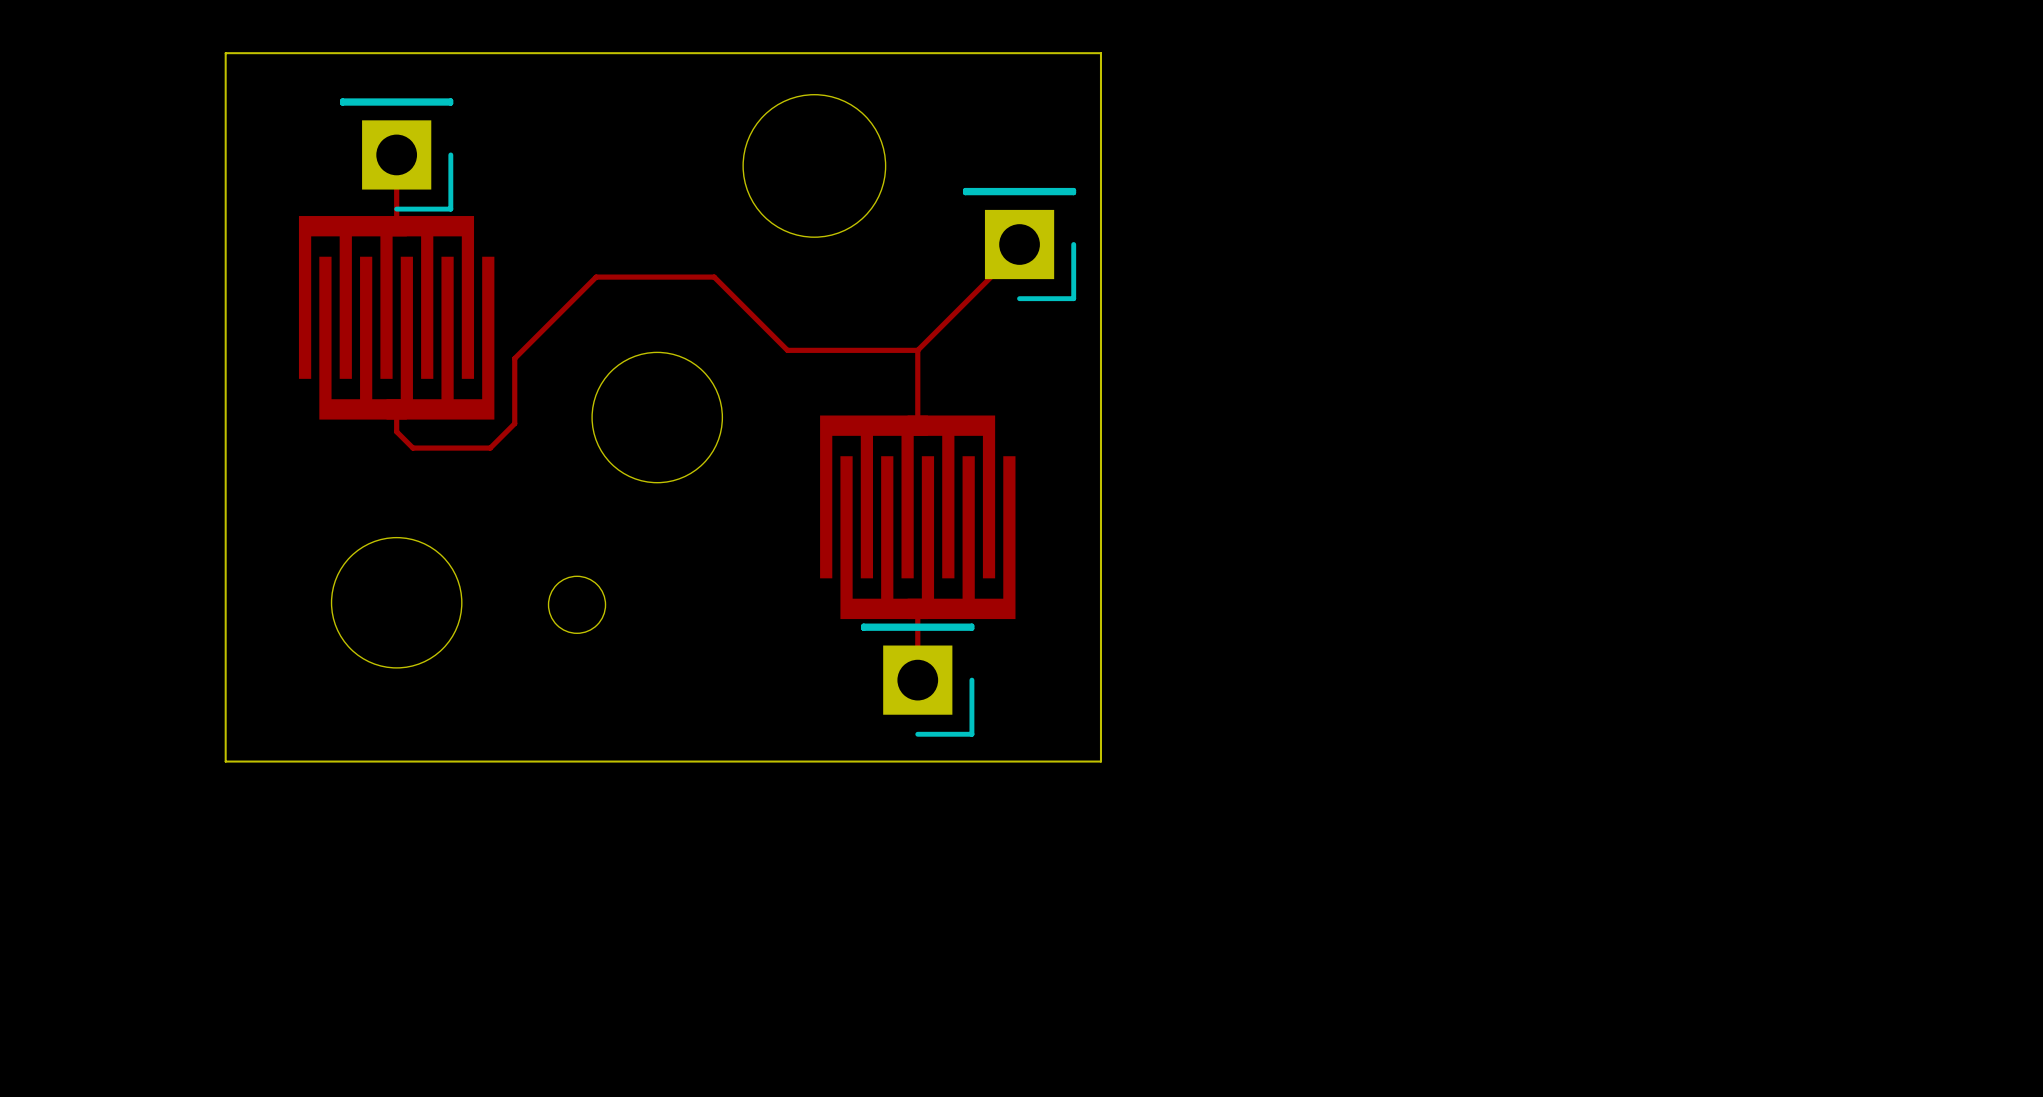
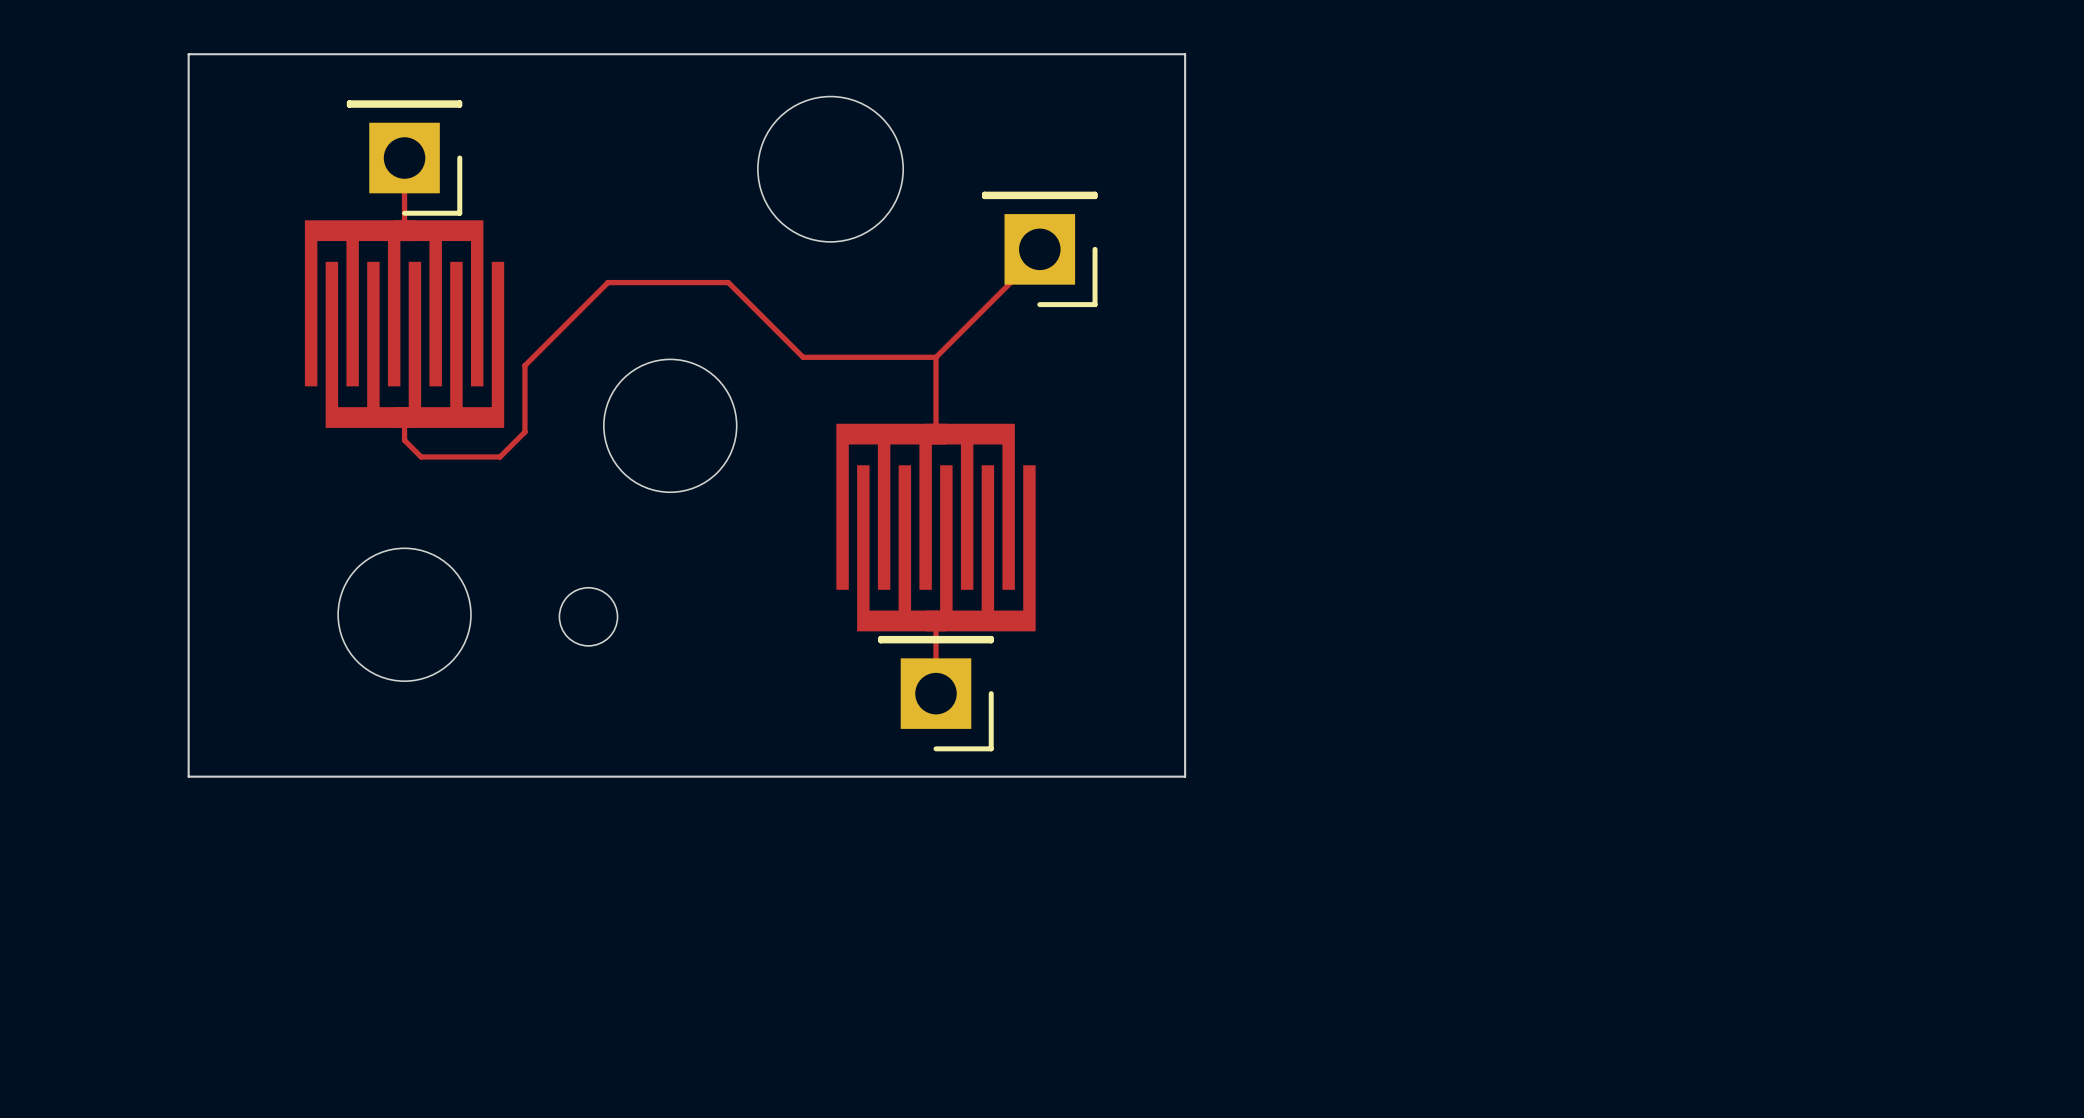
board edge: (225, 53) (225, 761) -> (230, 54) (188, 54) (188, 776) (230, 776)
board edge: (1100, 53) (1100, 761) -> (1122, 54) (1185, 54) (1185, 776) (1122, 776)

